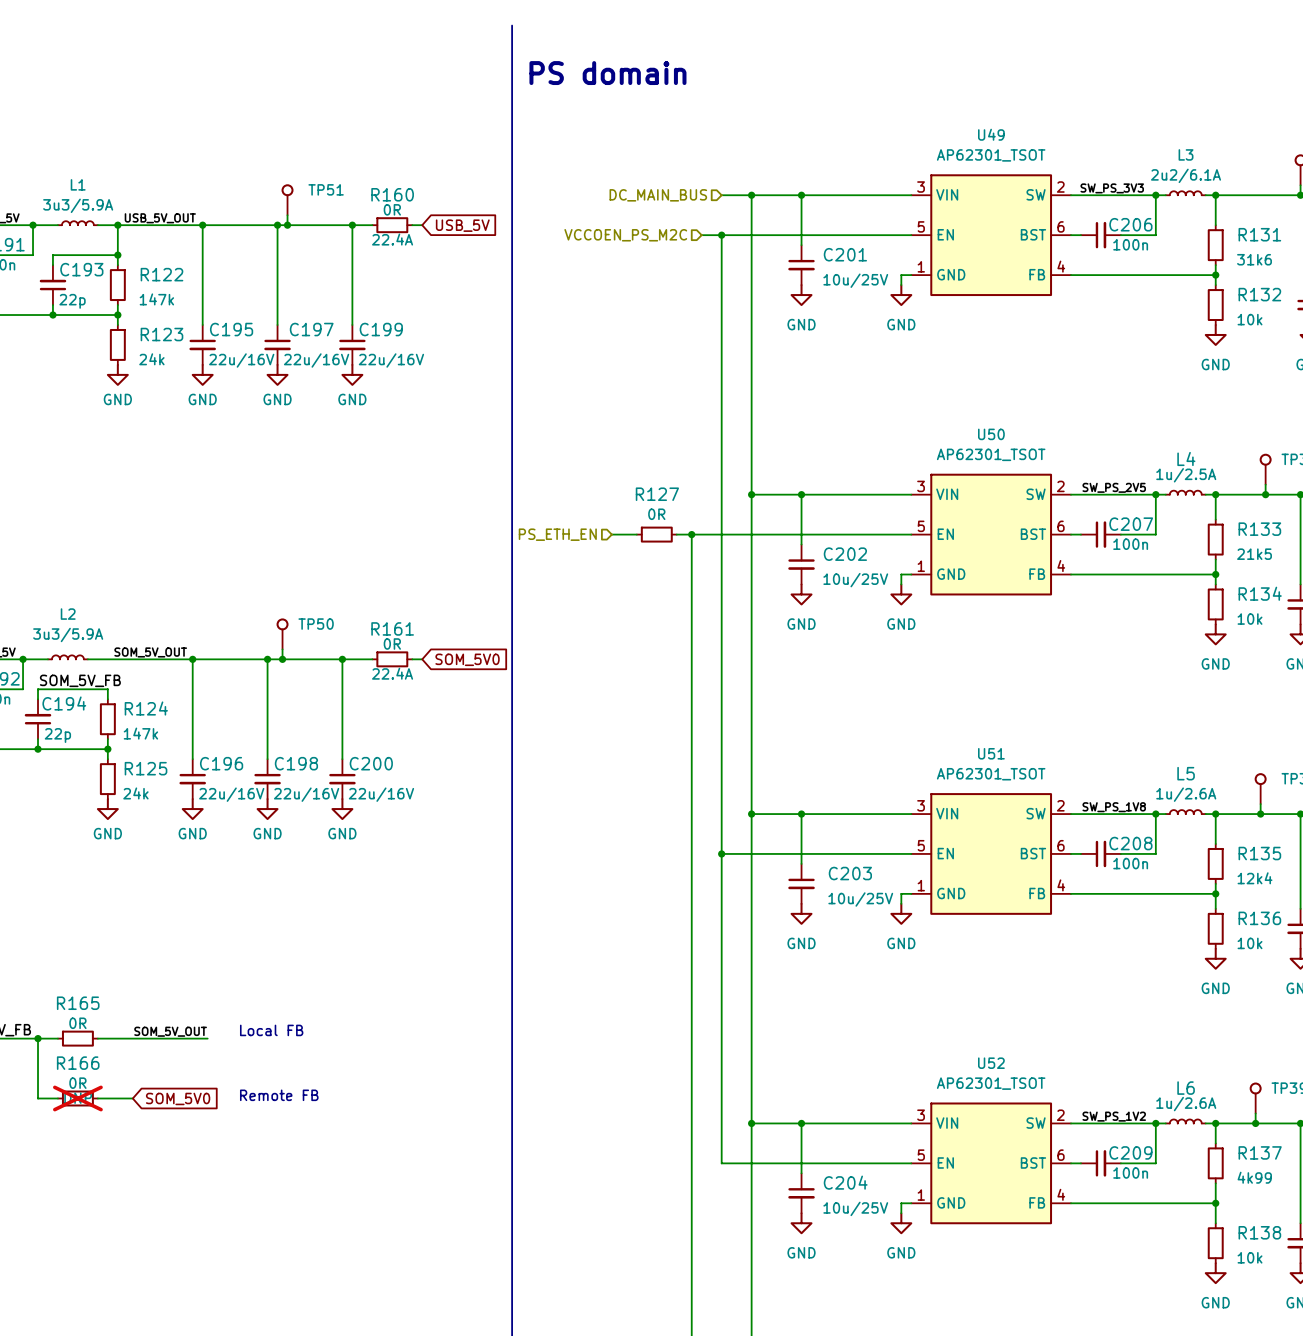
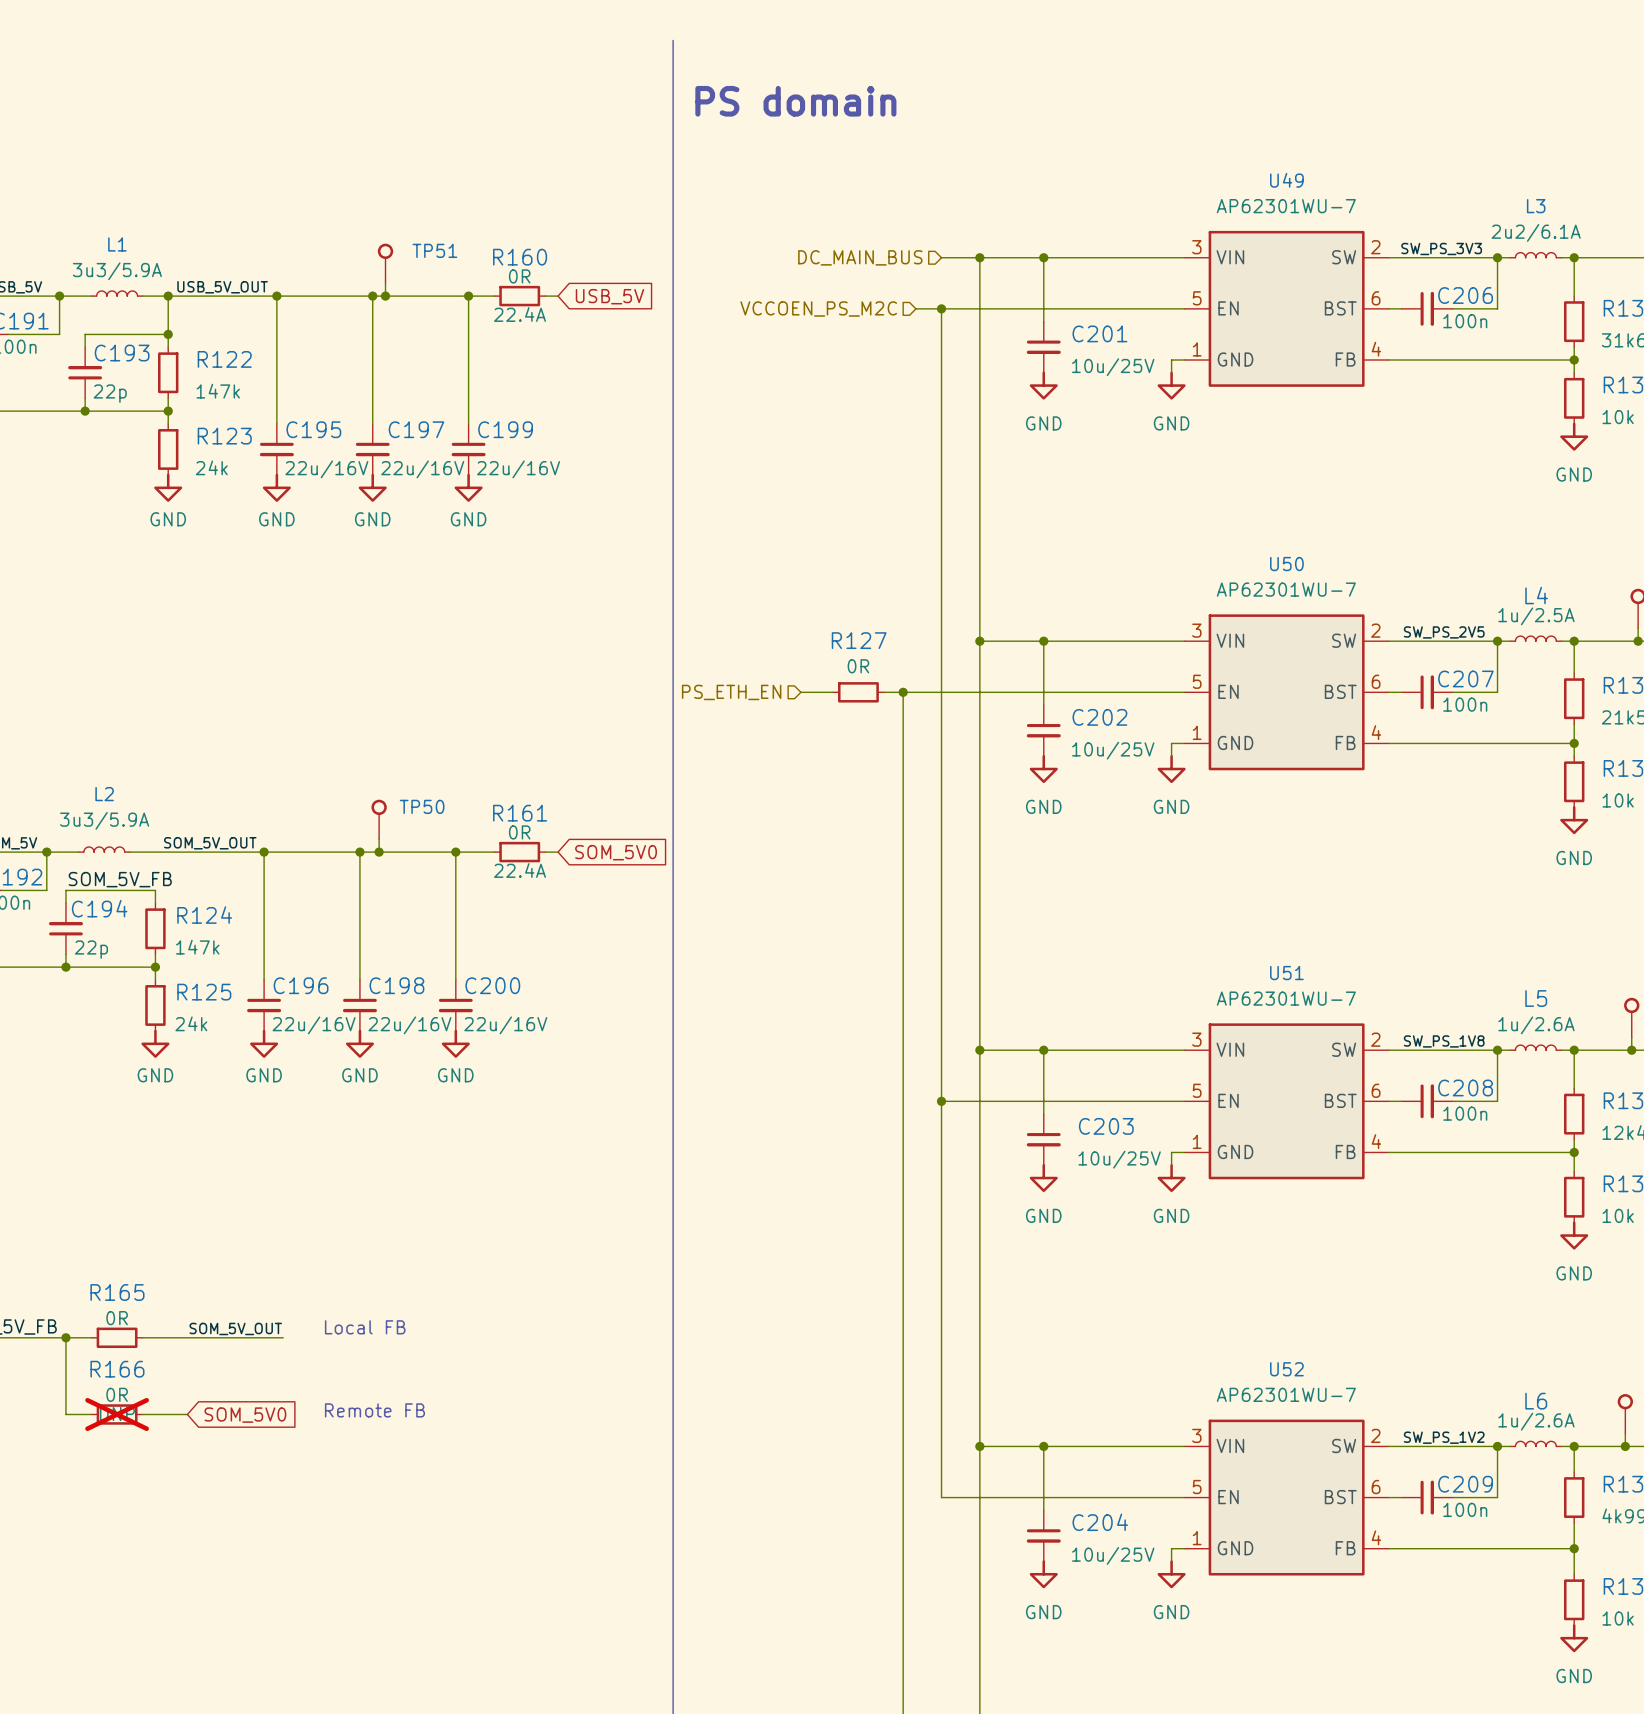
U49 value: AP62301_TSOT (991, 155) -> AP62301WU-7 (1286, 206)
U50 value: AP62301_TSOT (991, 454) -> AP62301WU-7 (1286, 589)
U51 value: AP62301_TSOT (991, 774) -> AP62301WU-7 (1286, 998)
U52 value: AP62301_TSOT (991, 1083) -> AP62301WU-7 (1286, 1394)

